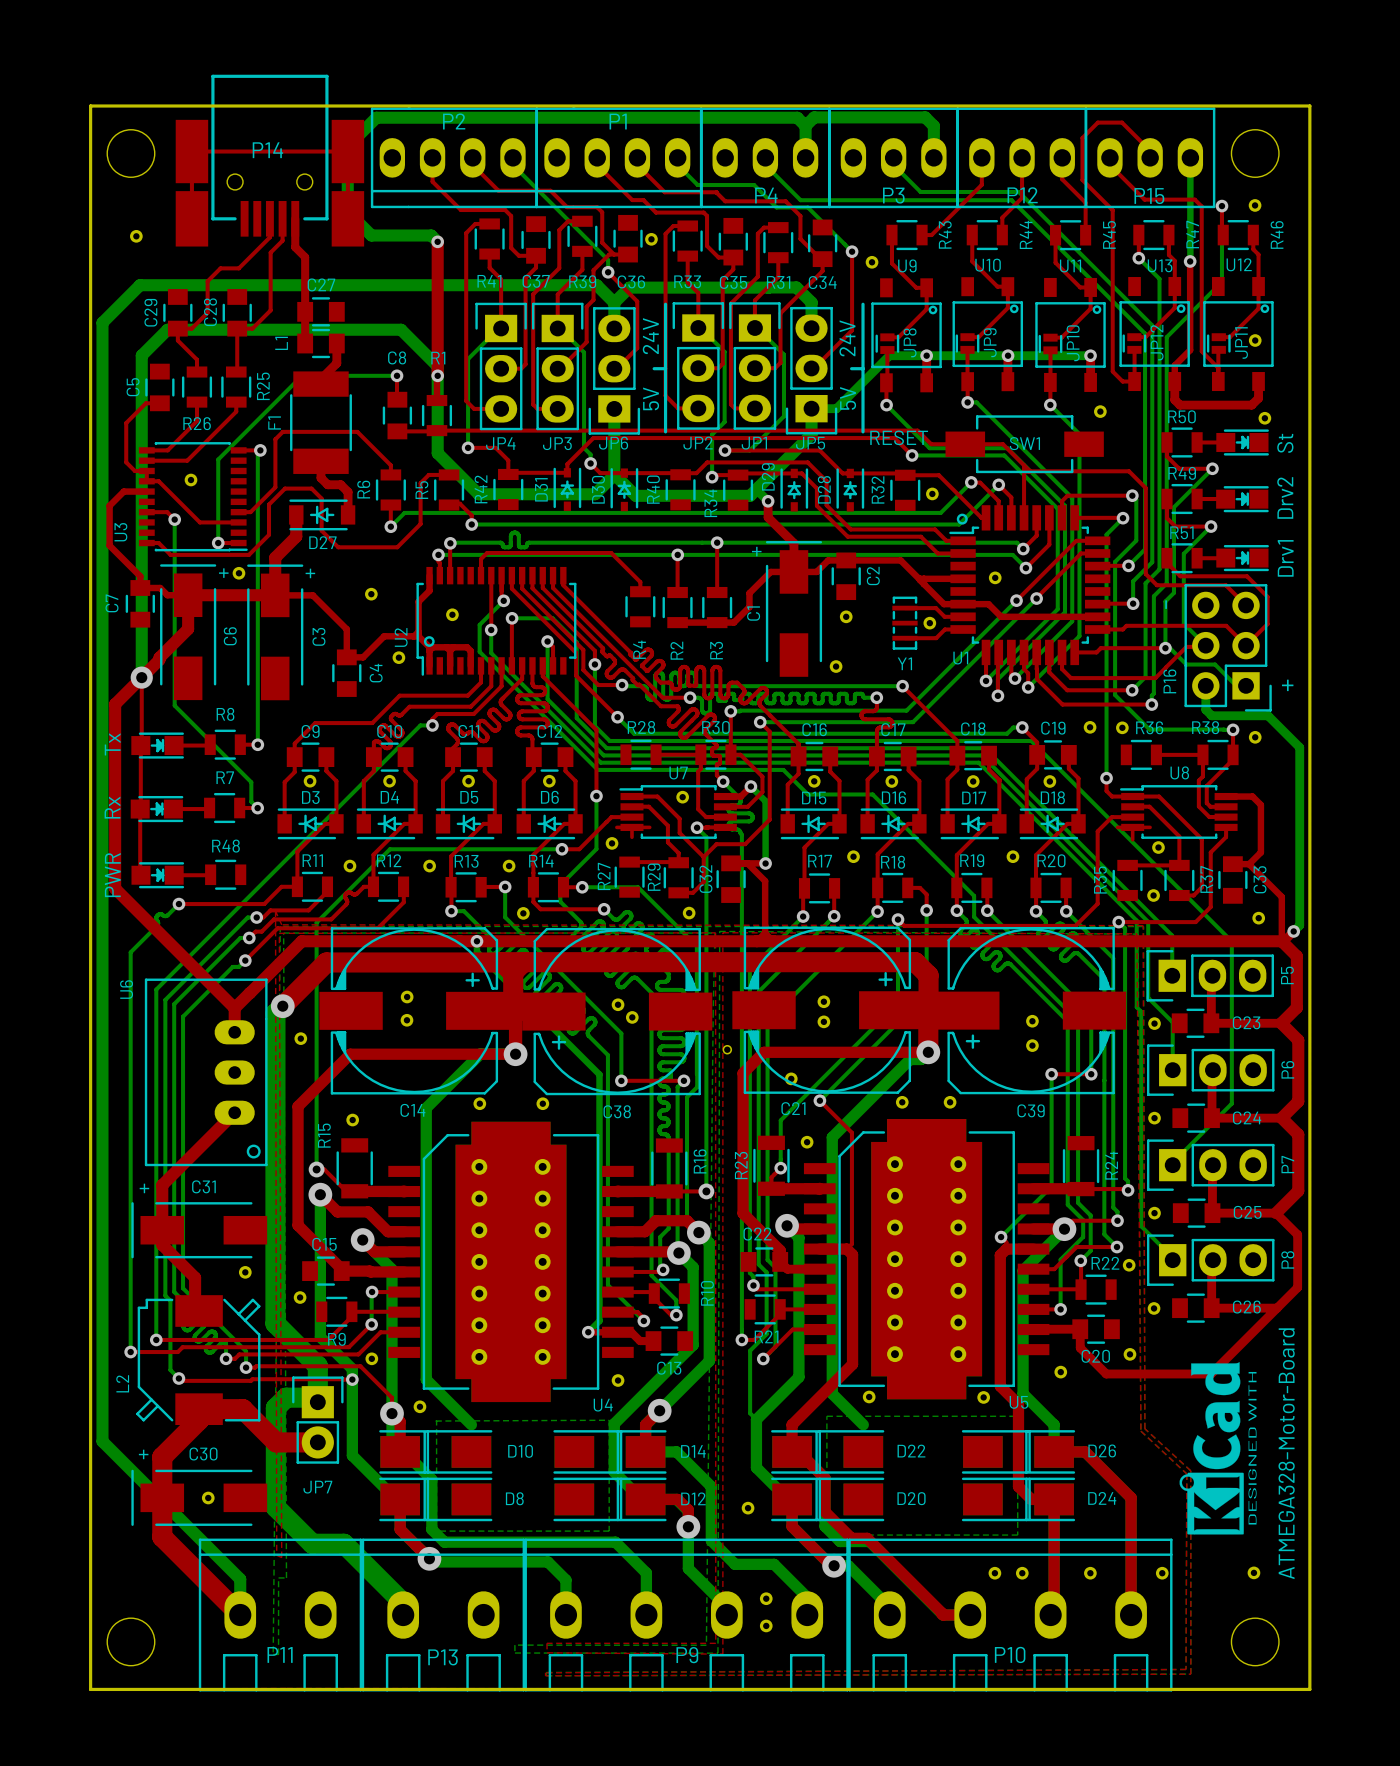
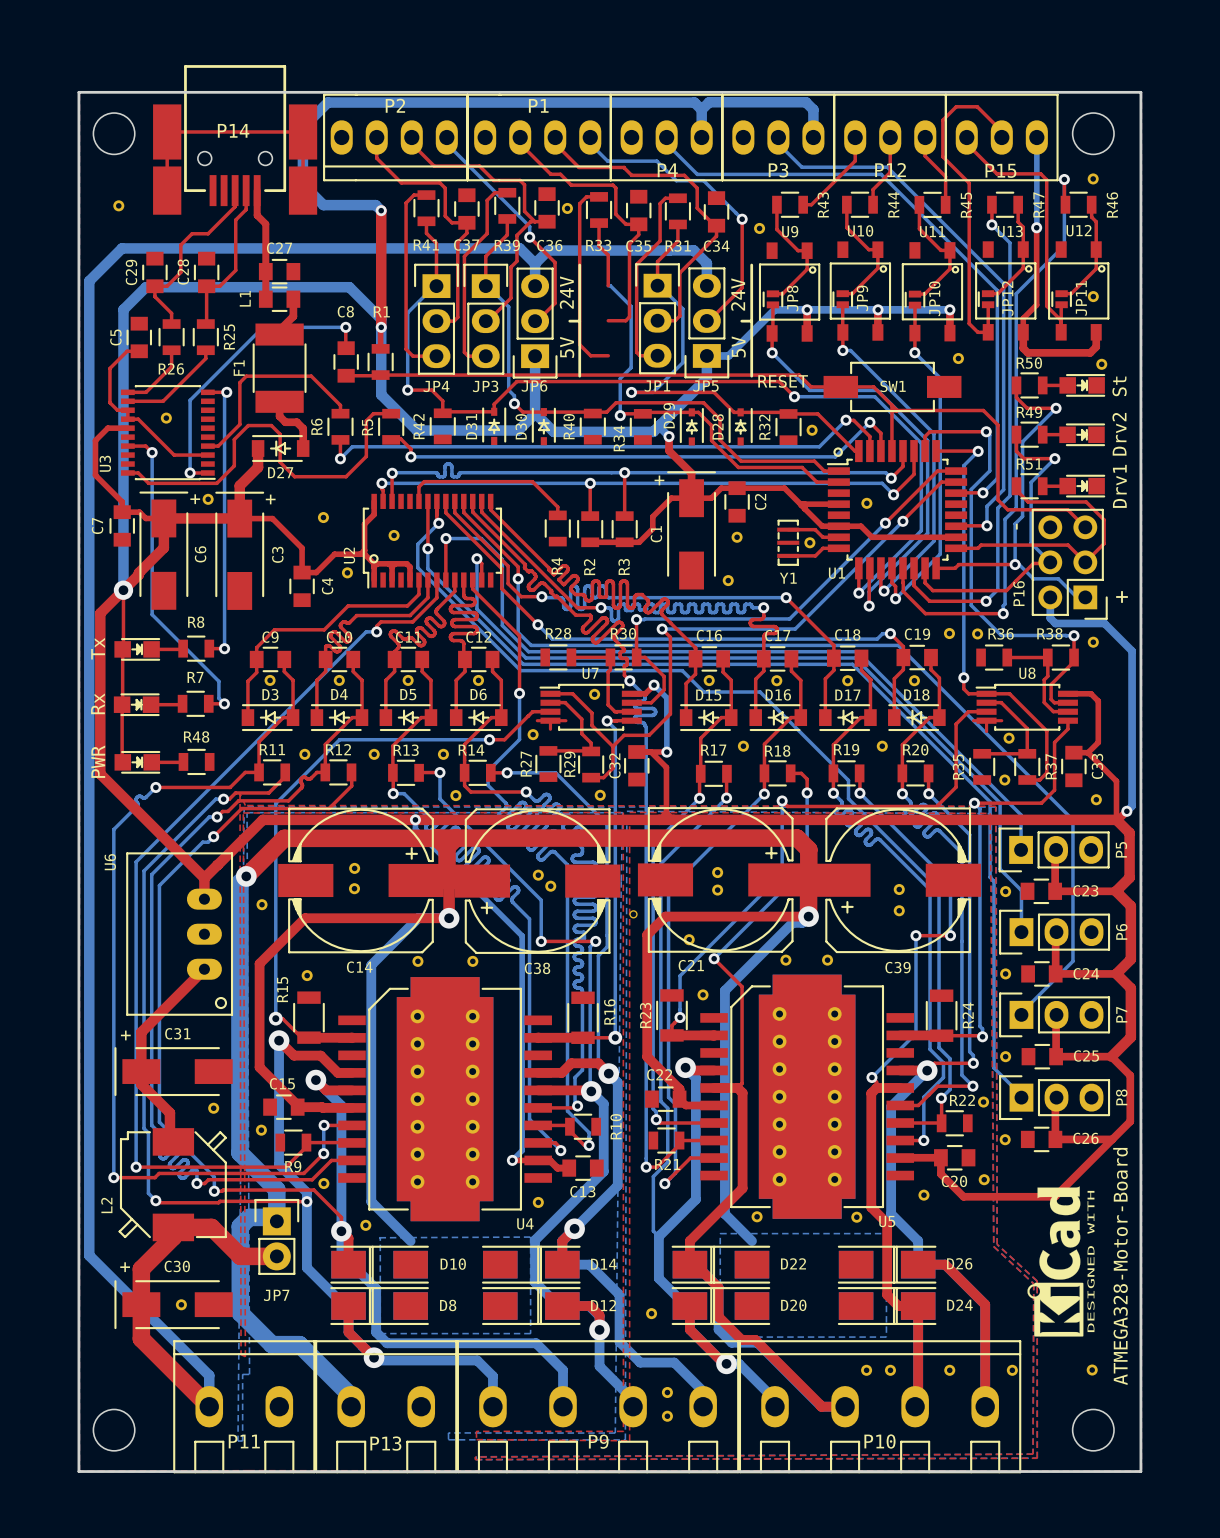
JP2: (698, 366) -> none

